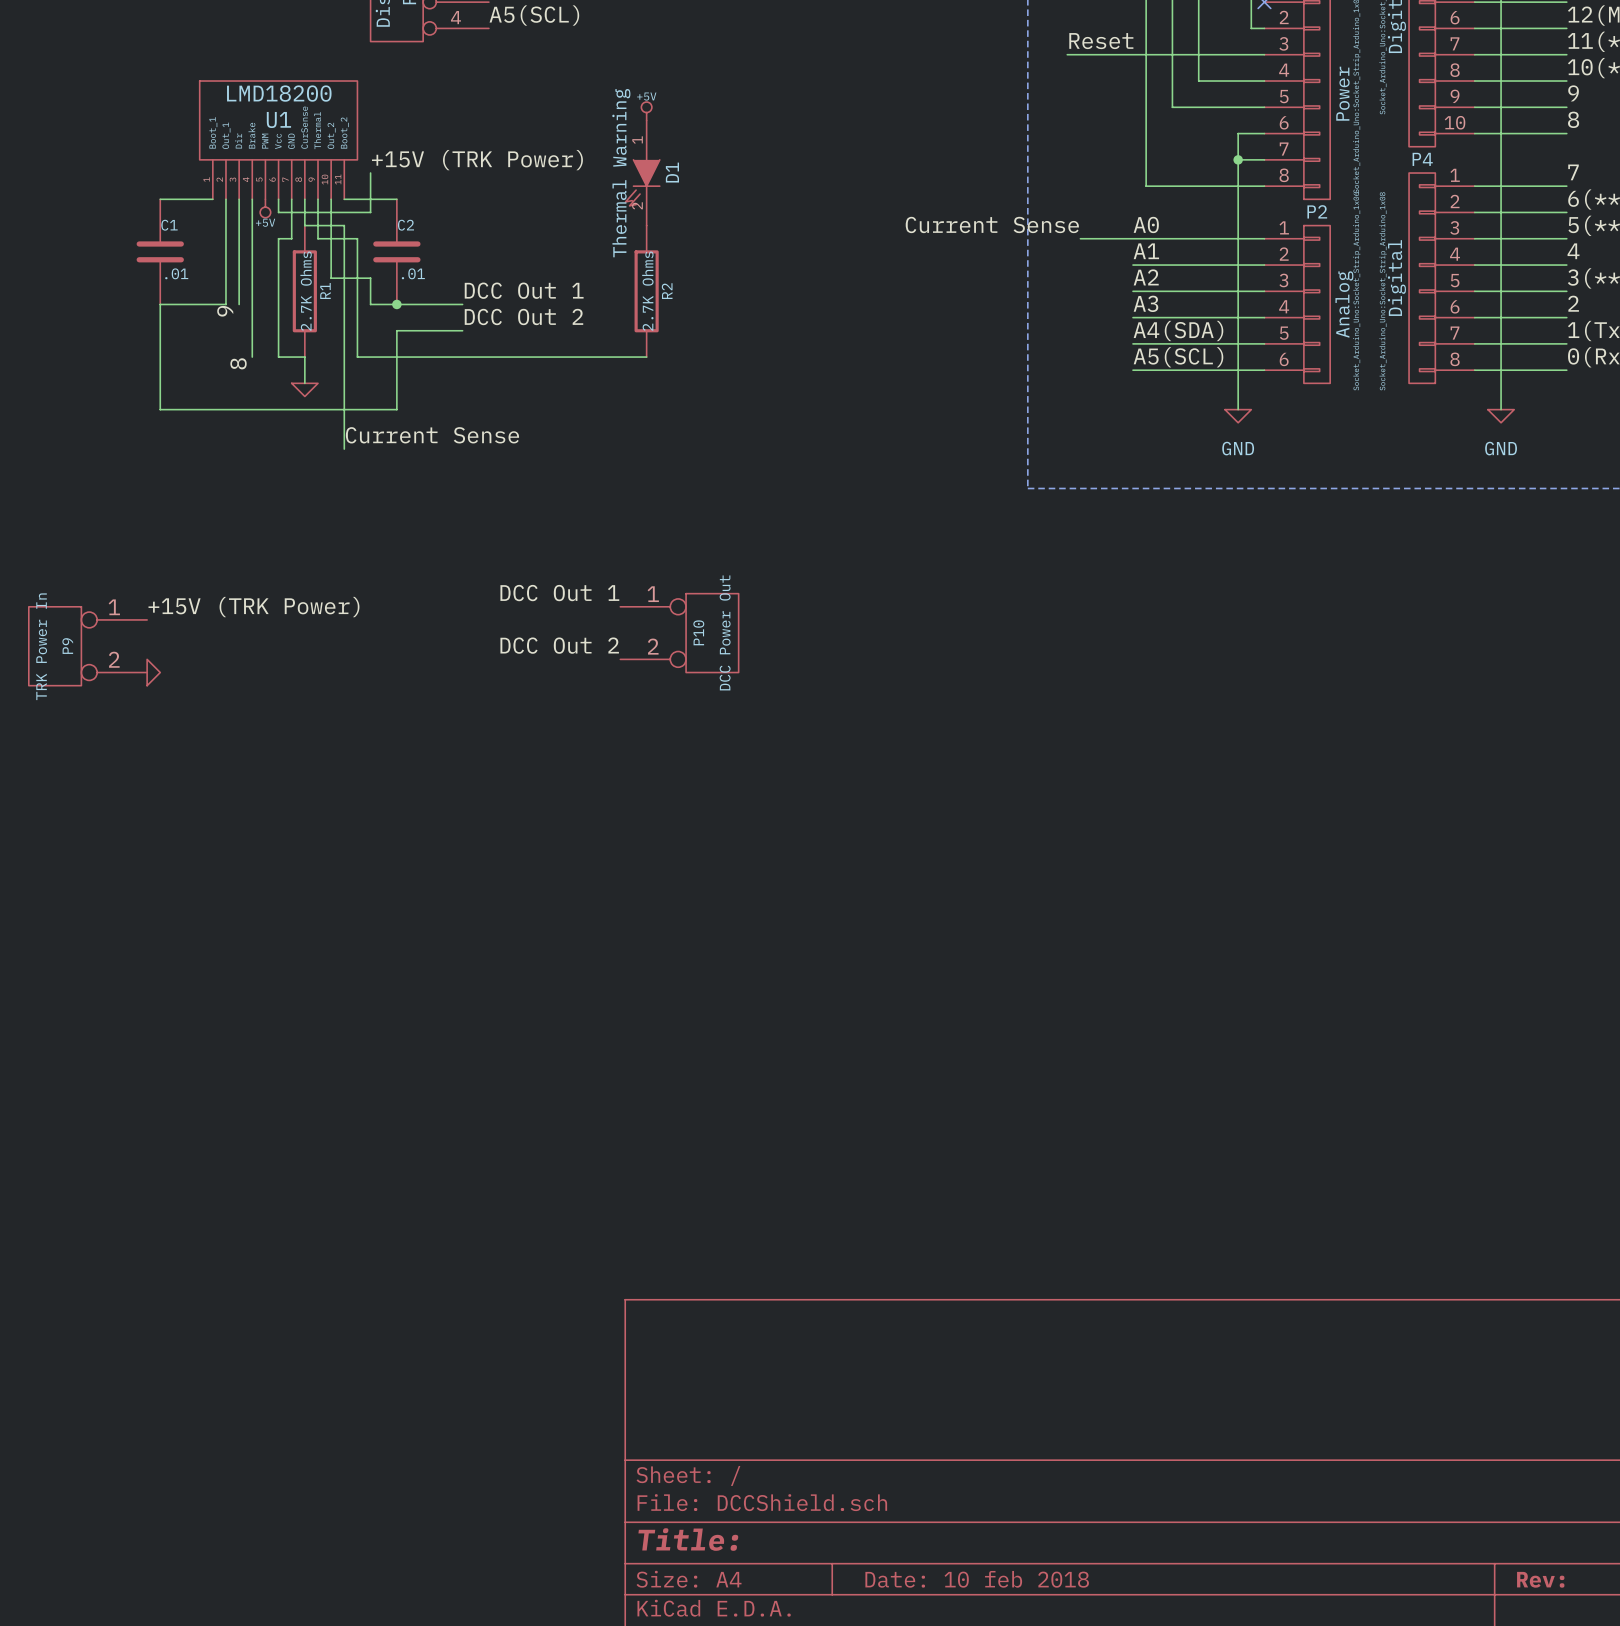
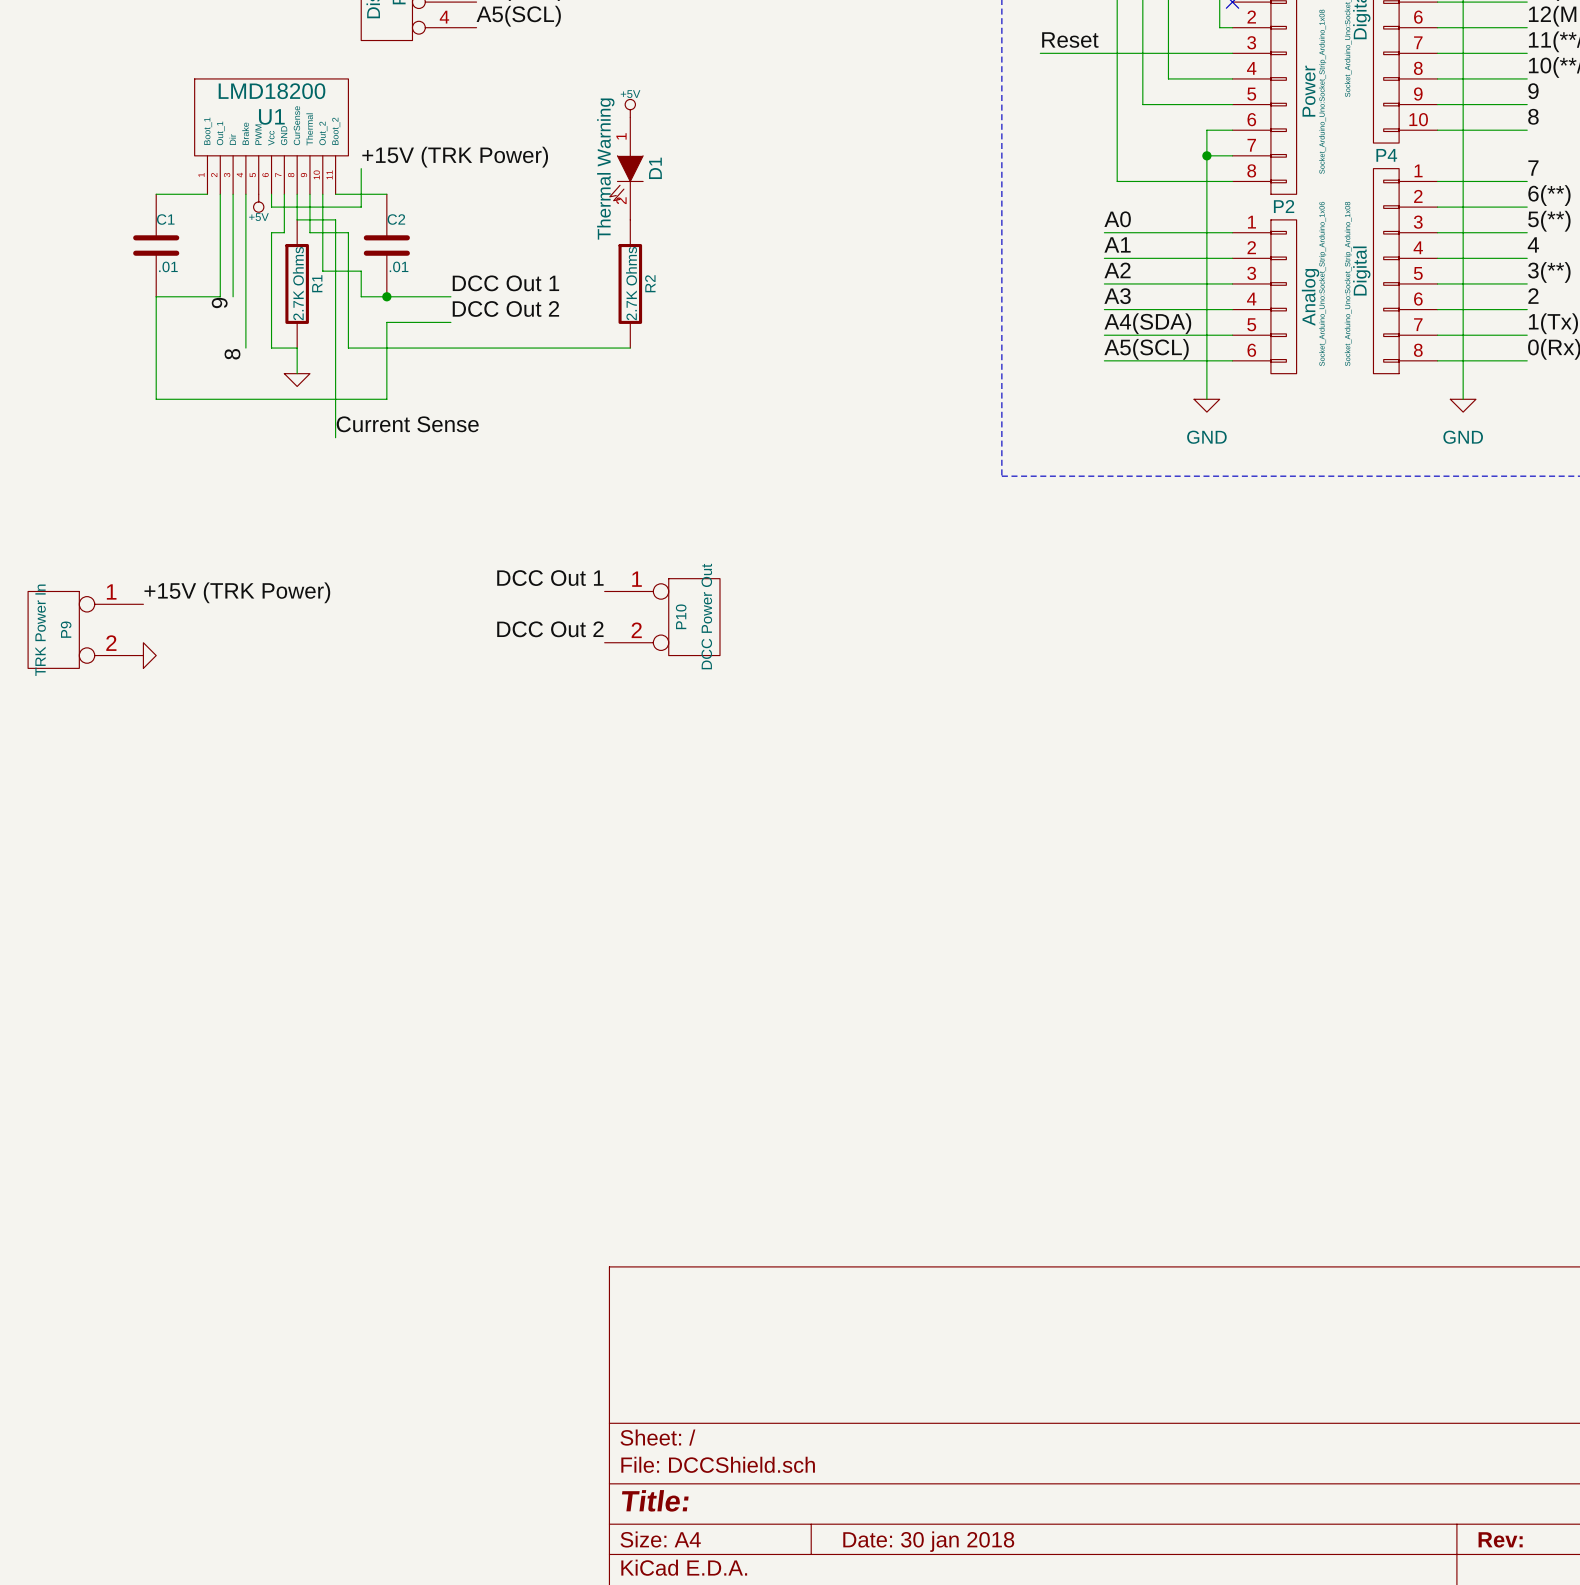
label: Current Sense (992, 224) -> none
wire: (1080, 238) (1132, 238) -> none
title block: Date: 10 feb 2018 (977, 1579) -> Date: 30 jan 2018 (928, 1541)

